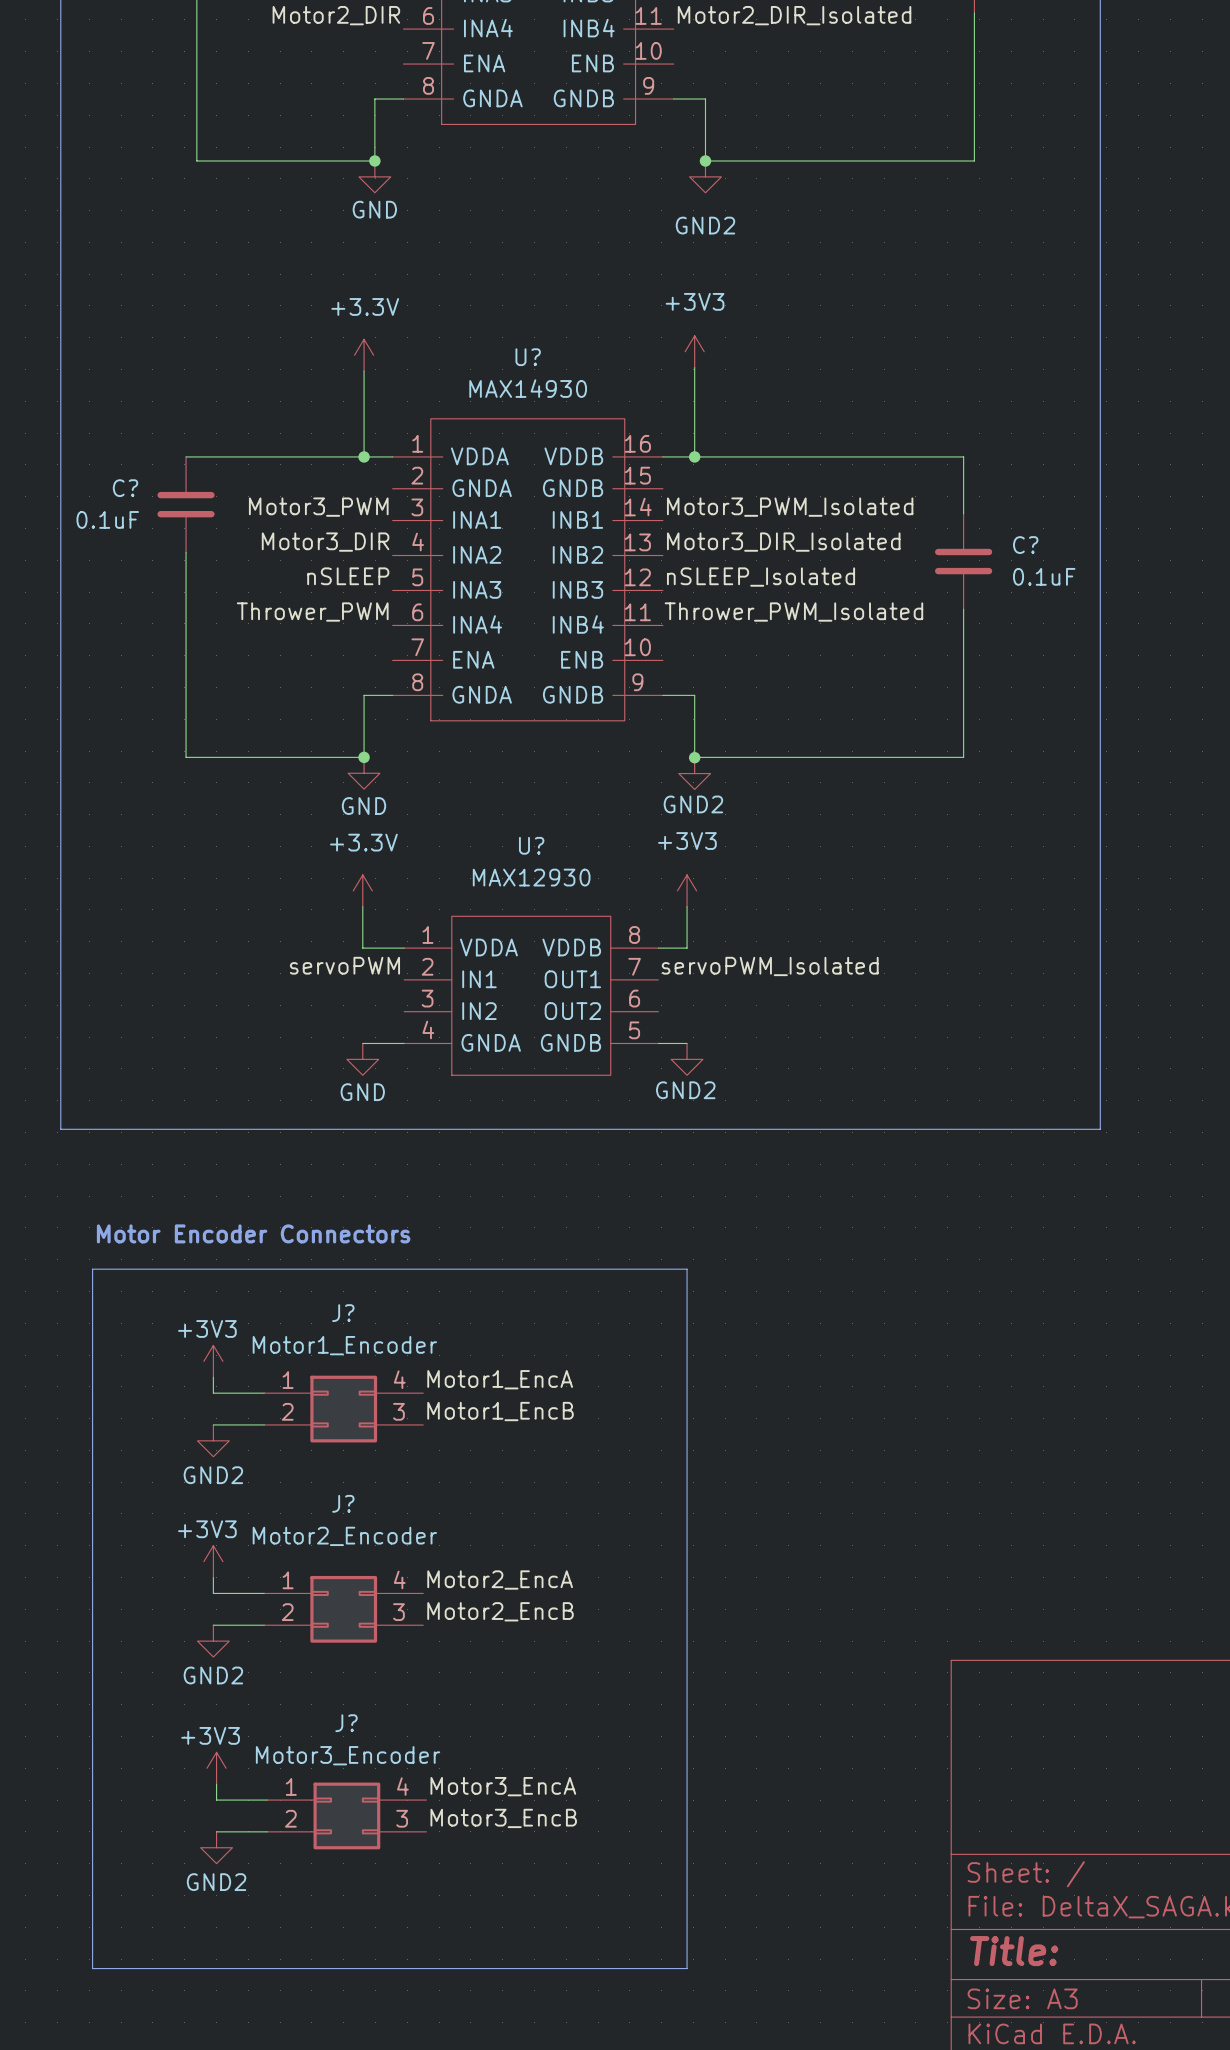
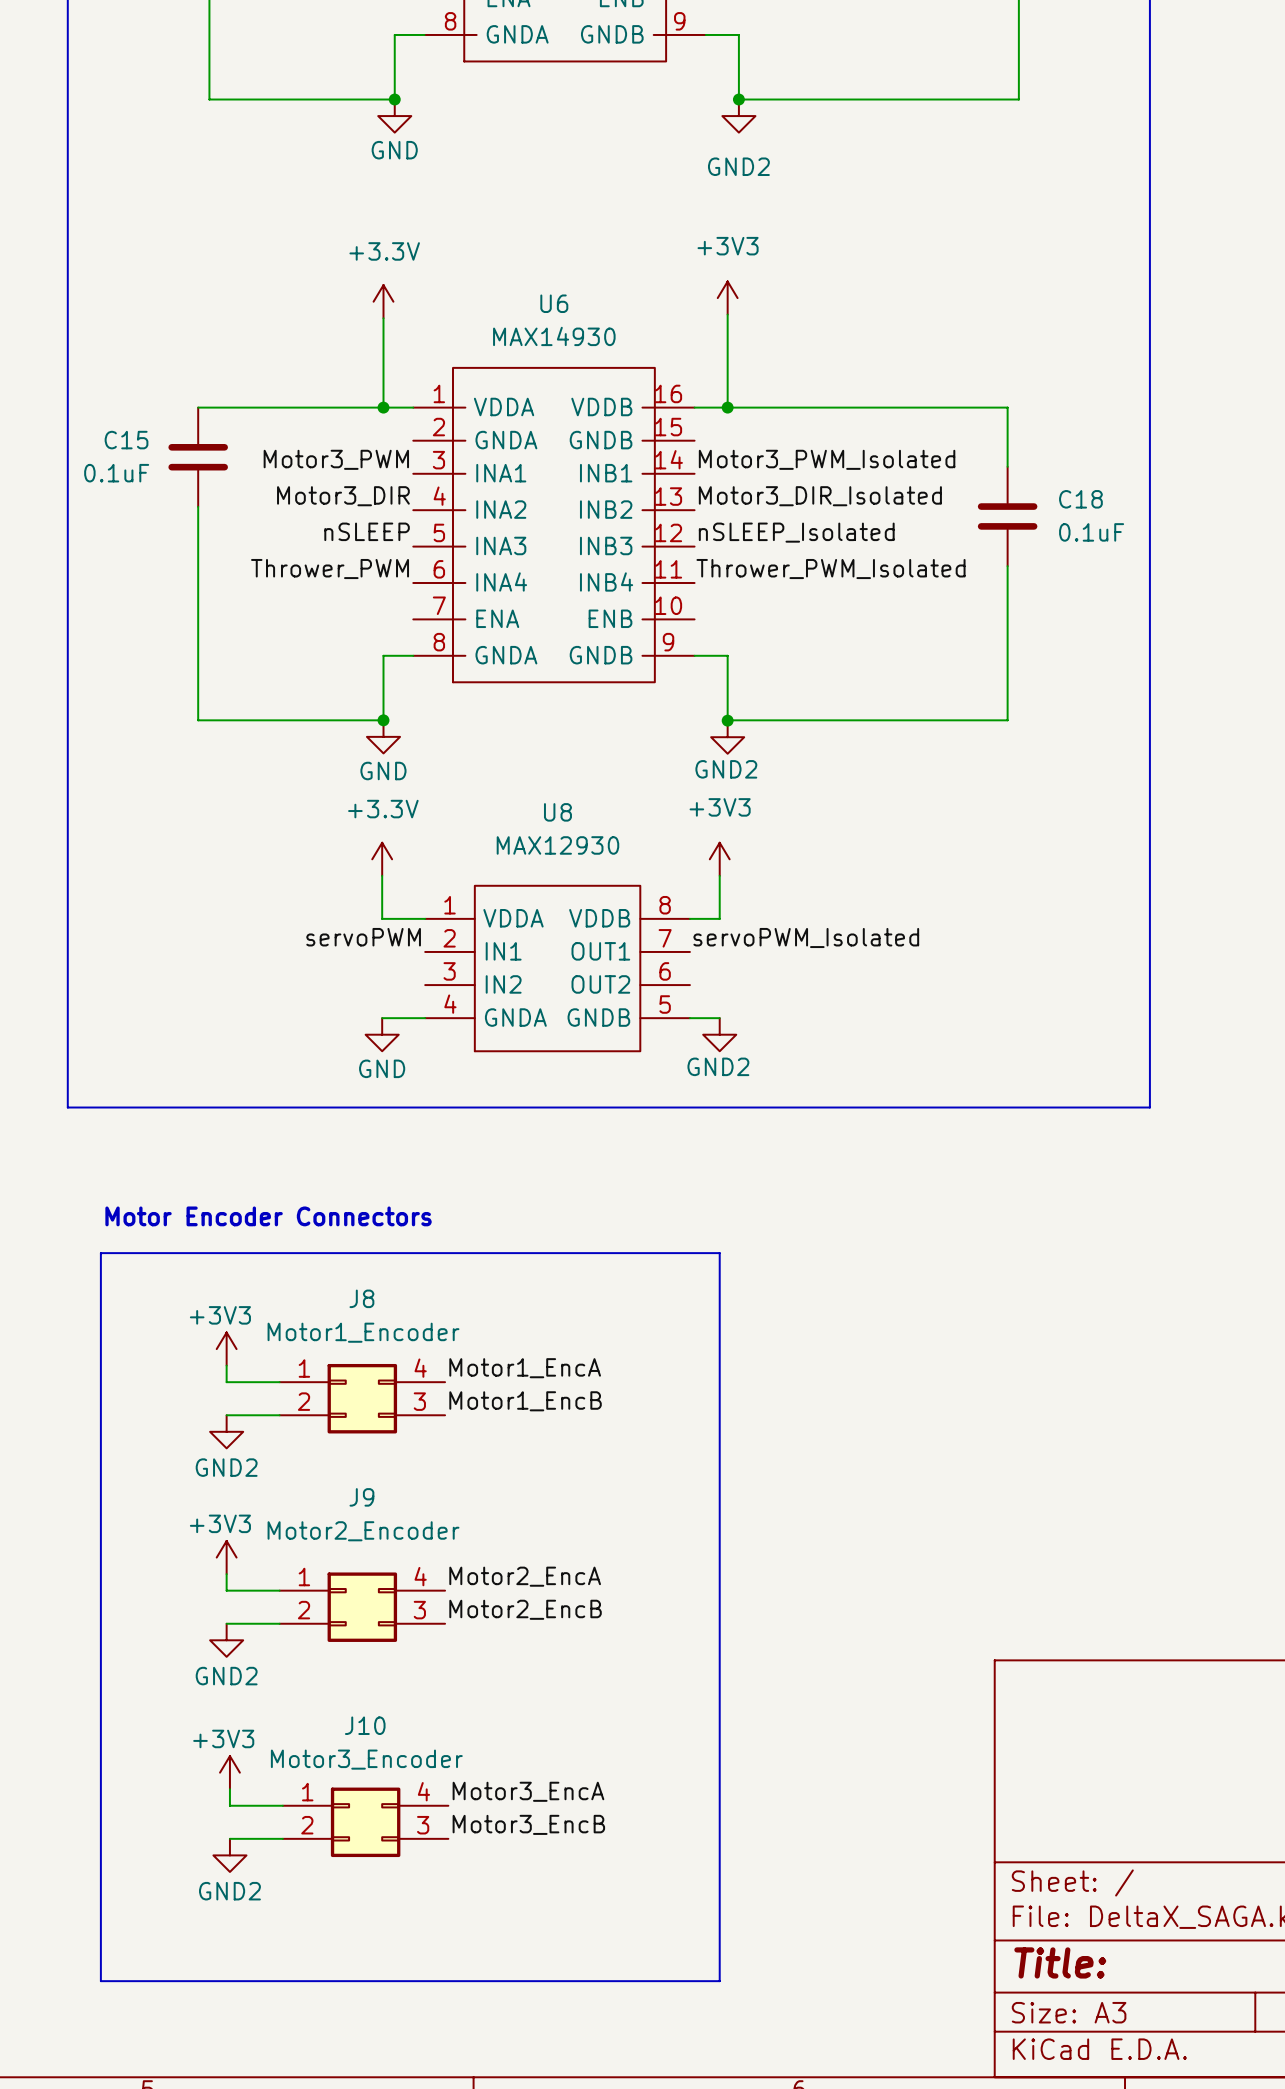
U? name: U? (528, 357) -> U6 (554, 303)
C? name: C? (125, 488) -> C15 (126, 440)
C? name: C? (1025, 545) -> C18 (1080, 499)
U? name: U? (531, 845) -> U8 (557, 812)
J? name: J? (343, 1313) -> J8 (361, 1298)
J? name: J? (343, 1503) -> J9 (361, 1497)
J? name: J? (346, 1723) -> J10 (365, 1725)

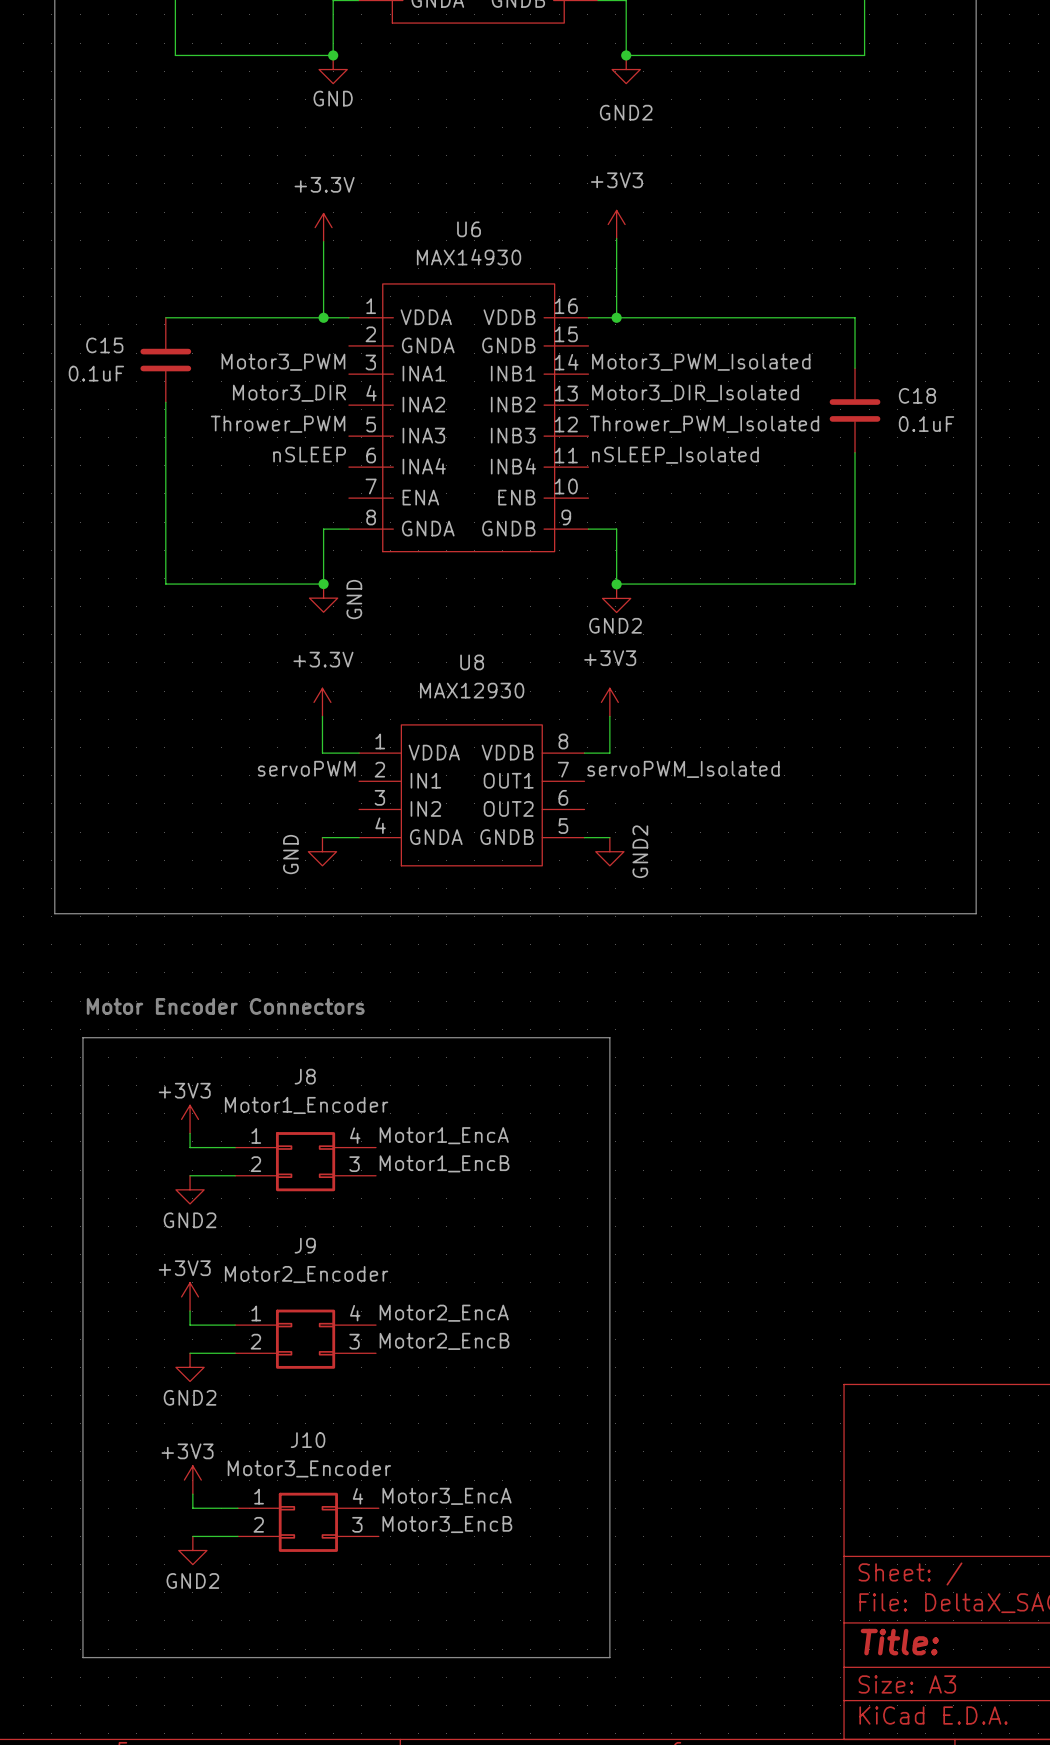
label: nSLEEP (367, 531) -> Thrower_PWM (278, 424)
label: nSLEEP_Isolated (796, 532) -> Thrower_PWM_Isolated (704, 424)
label: Thrower_PWM (330, 569) -> nSLEEP (309, 454)
label: Thrower_PWM_Isolated (831, 569) -> nSLEEP_Isolated (675, 455)
power symbol text rotation: 0° (383, 771) -> 90° counterclockwise (354, 599)
power symbol text rotation: 0° (718, 1066) -> 90° counterclockwise (640, 851)
power symbol text rotation: 0° (382, 1068) -> 90° counterclockwise (290, 854)

